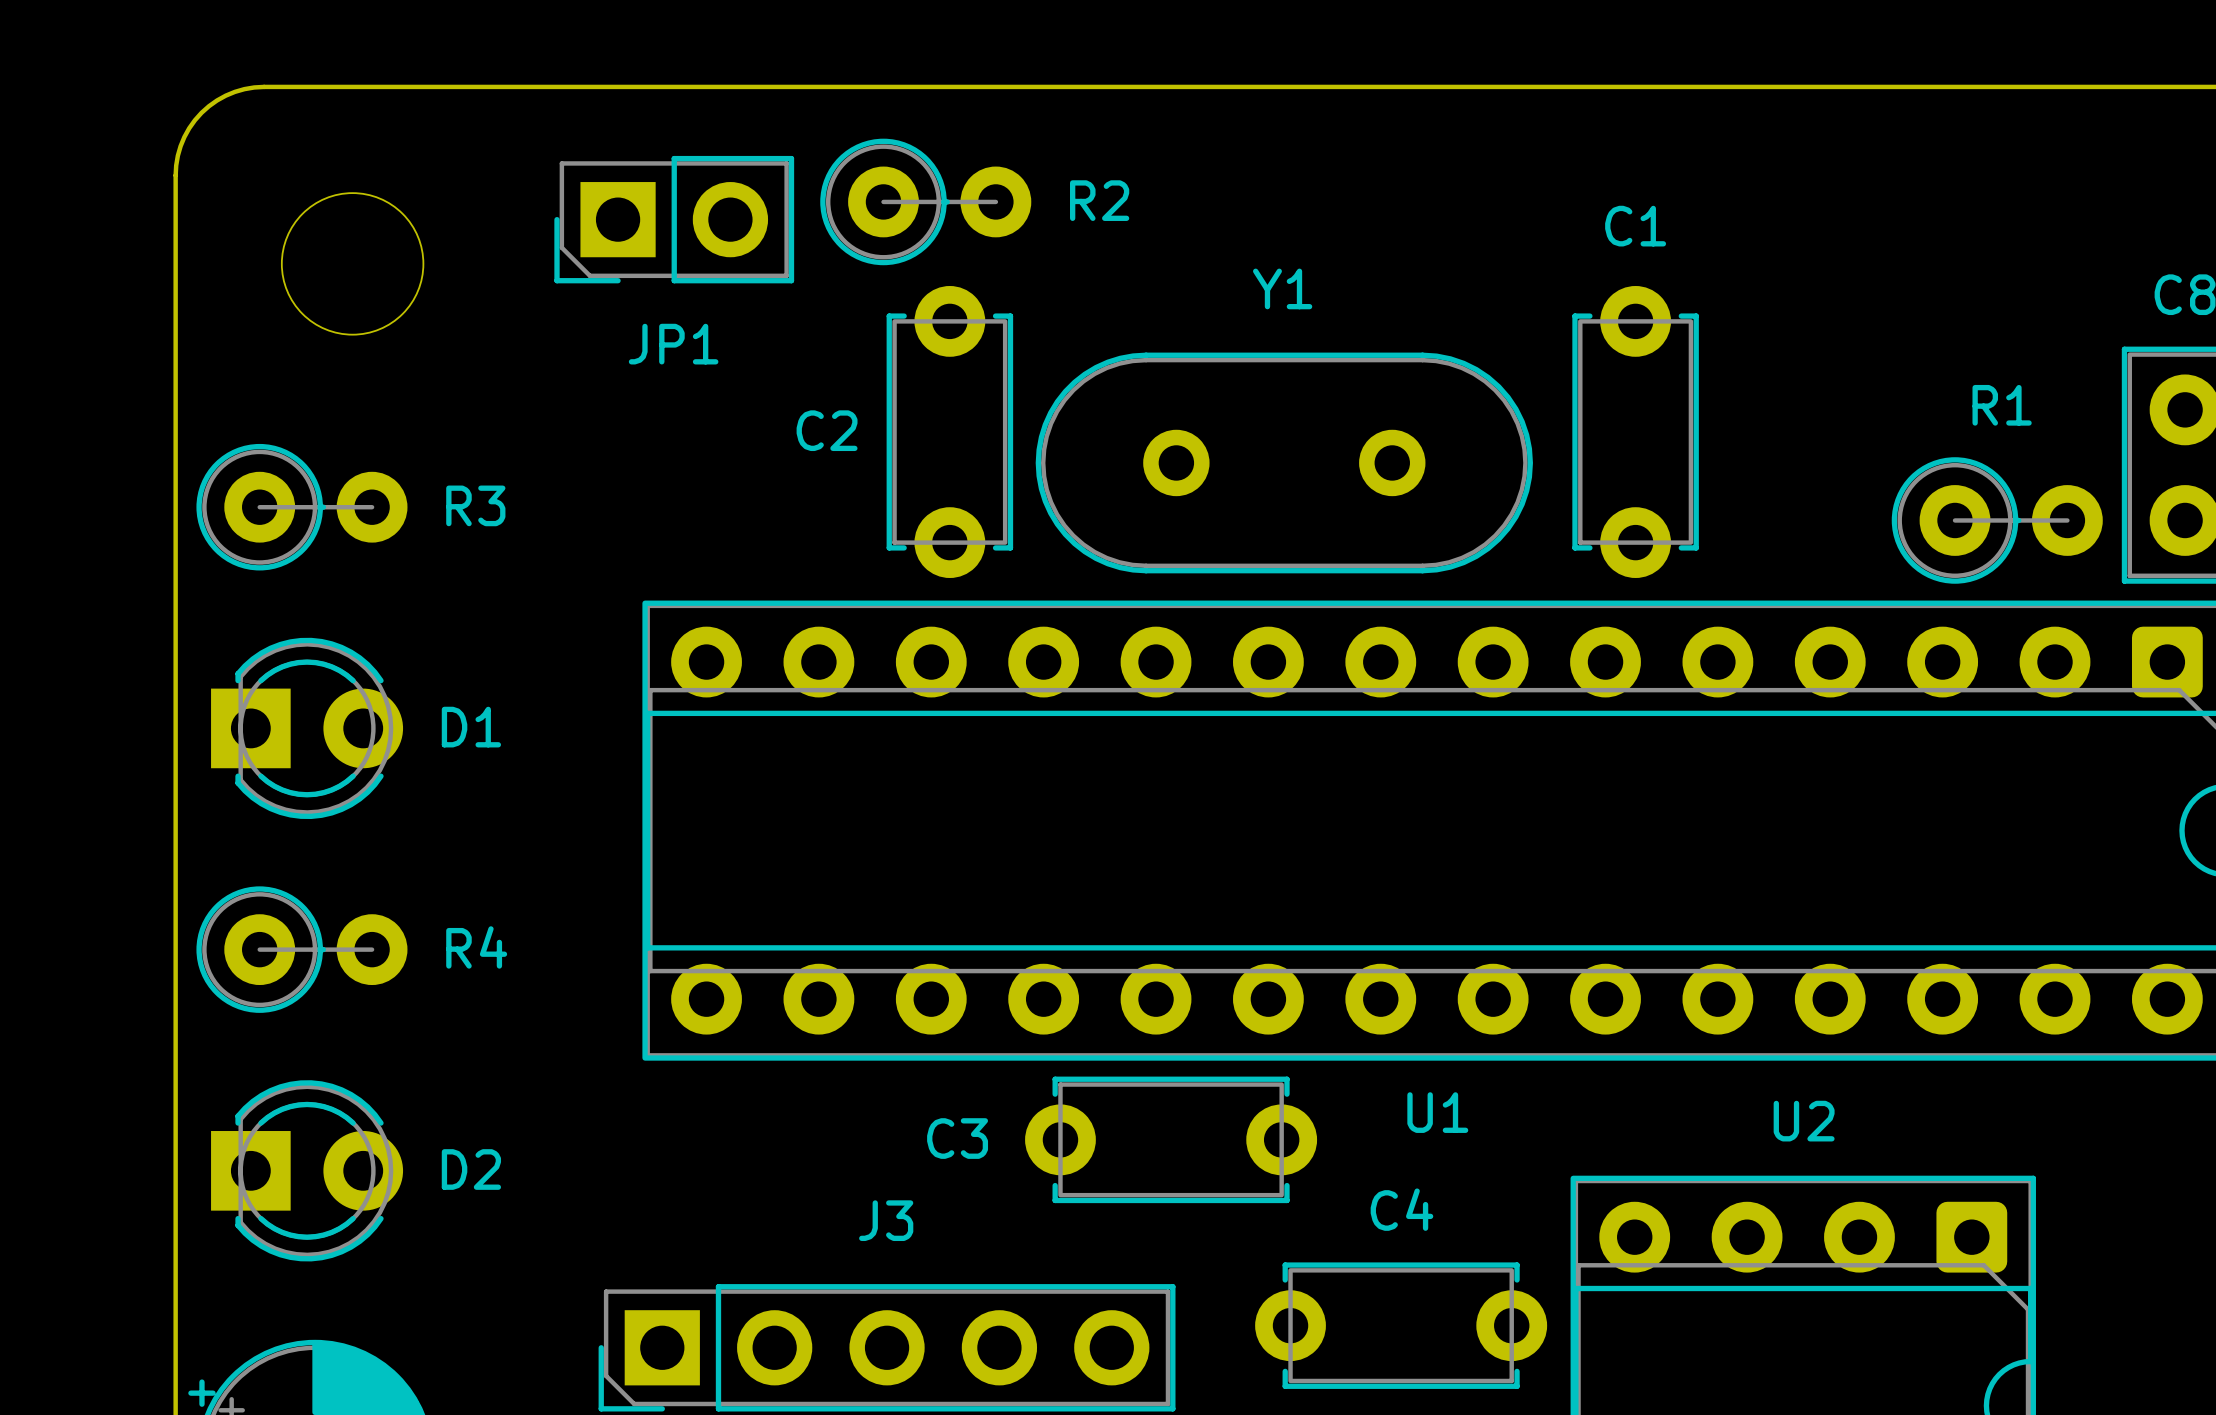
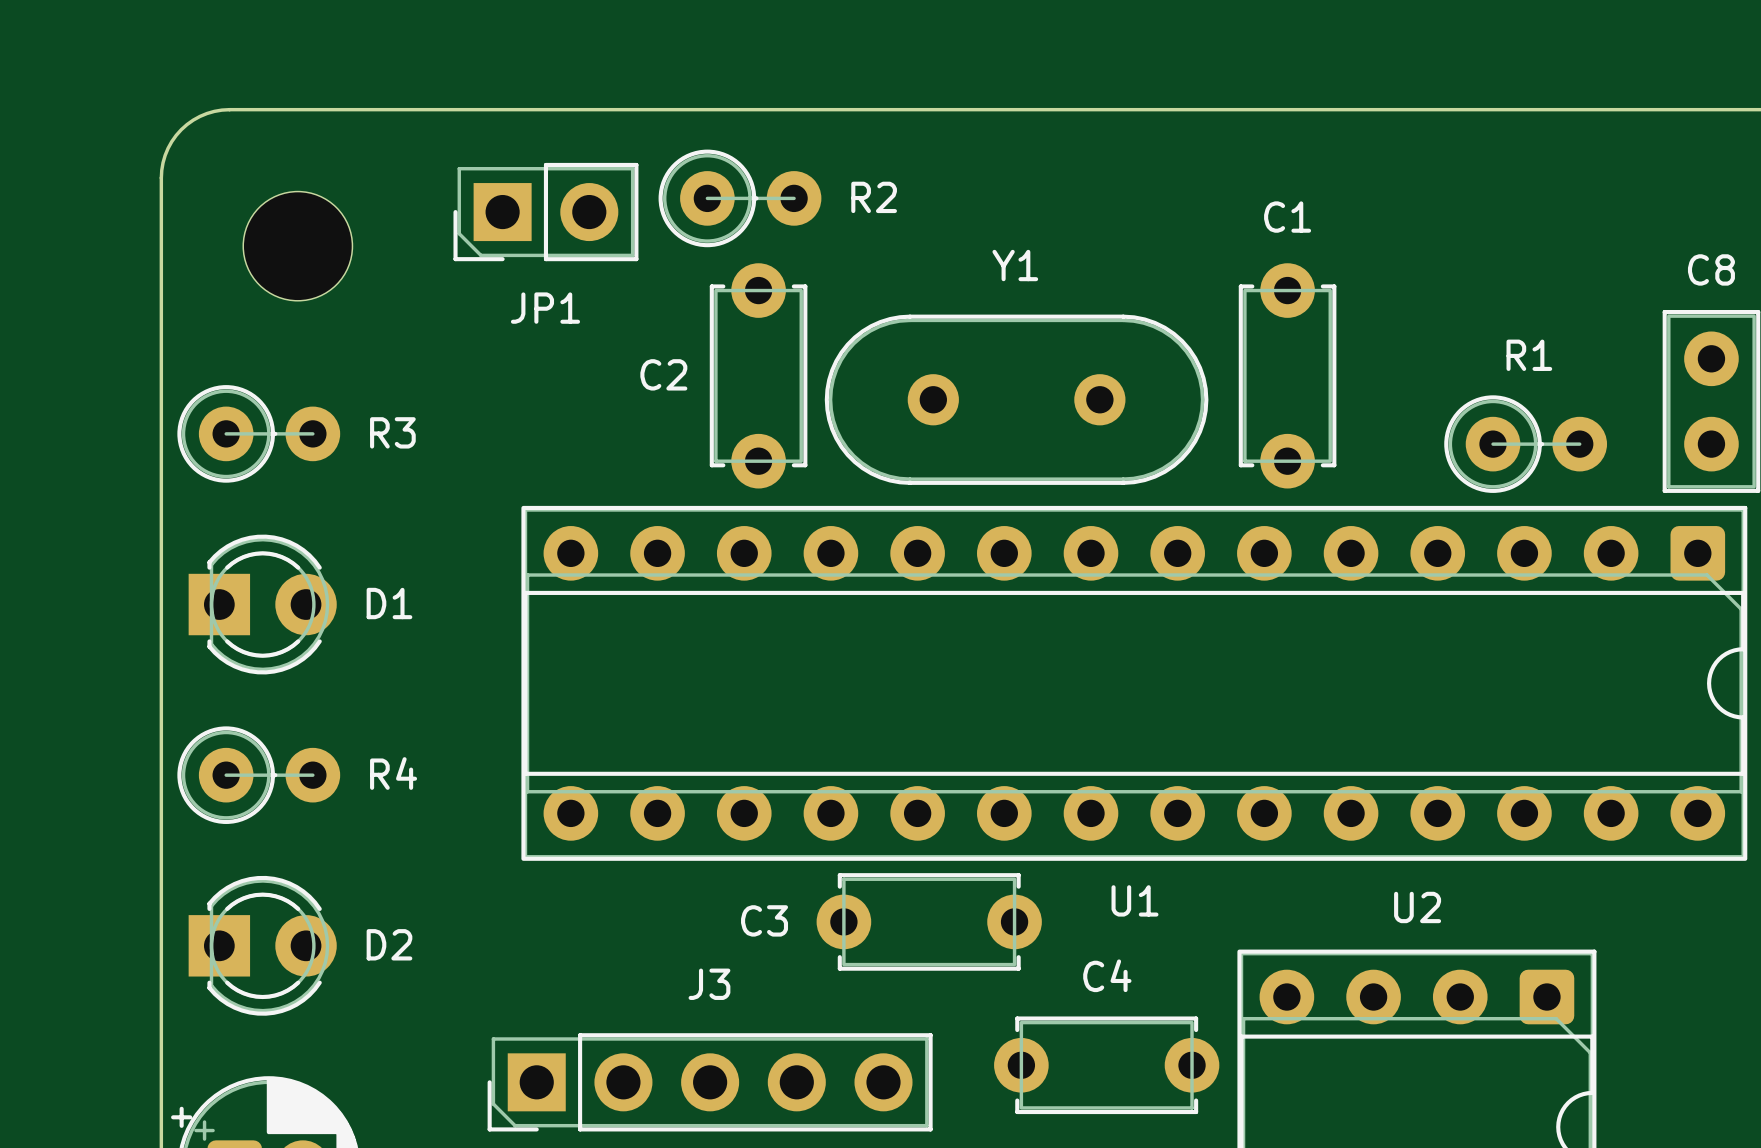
R1 position: (1997, 520) -> (1525, 444)

